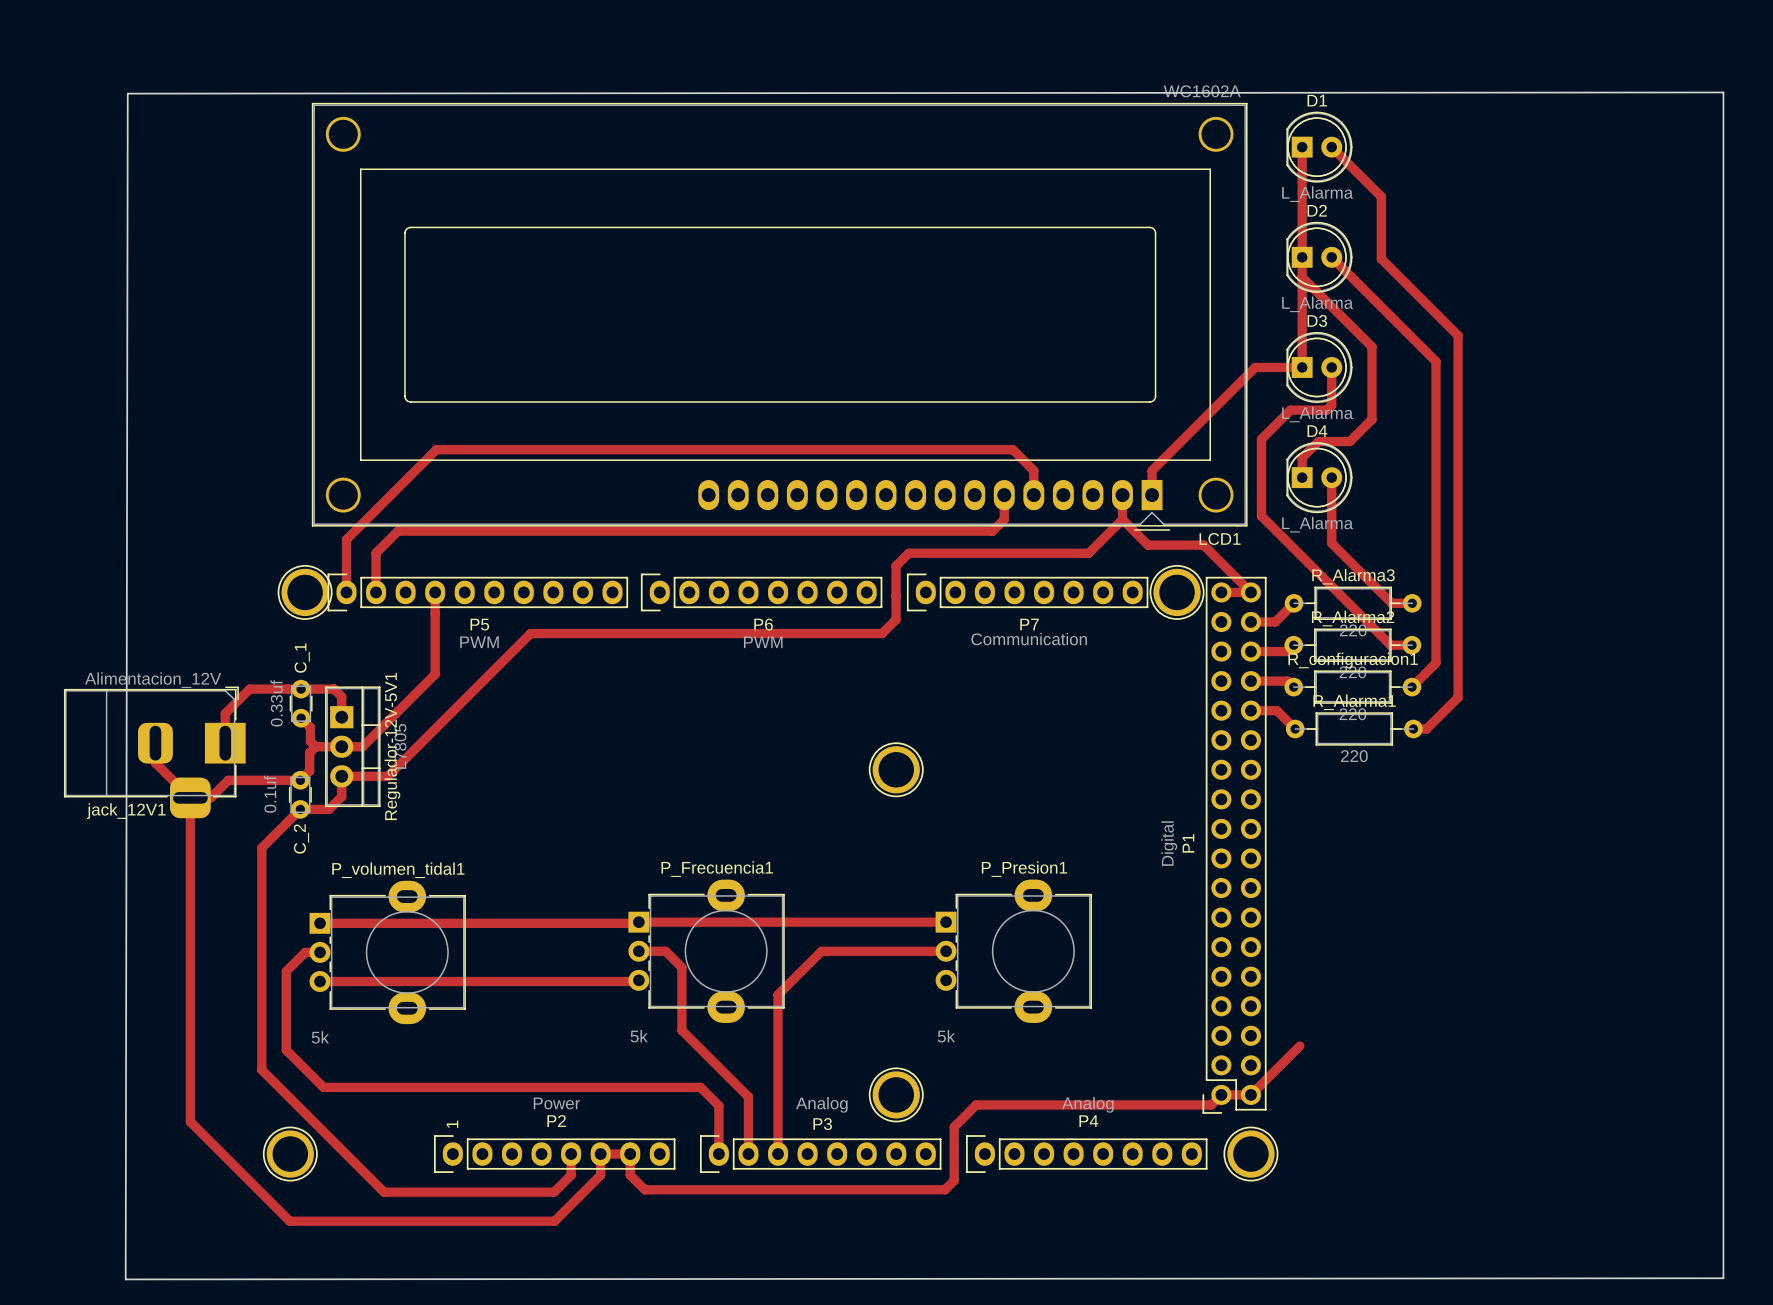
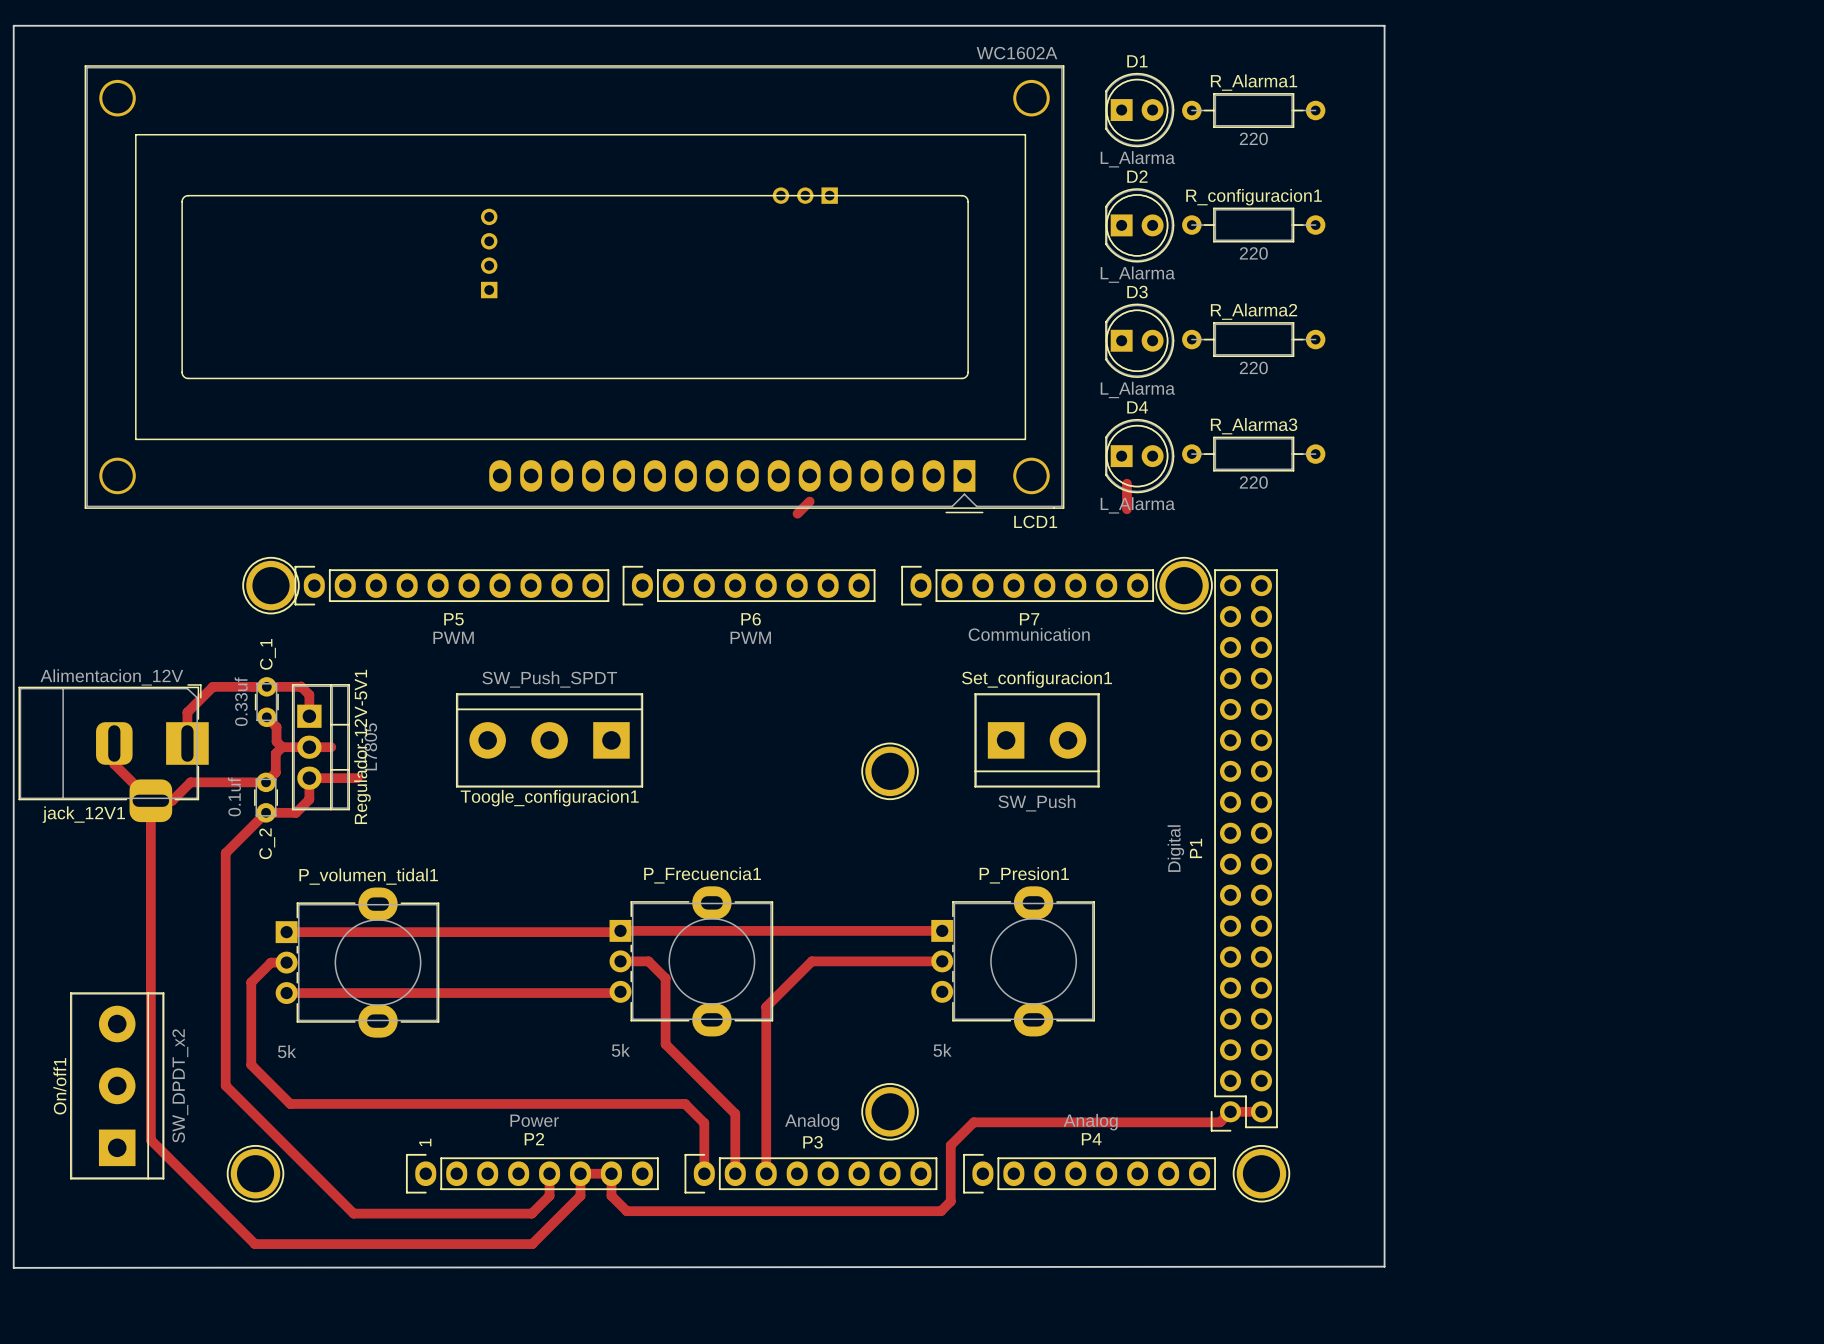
board edge: (1723, 92) (1723, 1278) (125, 1279) (127, 93) (1723, 92) -> (13, 25) (13, 1267) (1384, 1266) (1384, 25) (13, 25)
track: (1302, 147) (1302, 367) (1255, 367) (1152, 470) (1152, 495) -> none
D1 position: (1319, 147) -> (1139, 110)
track: (1331, 147) (1381, 196) (1381, 258) (1458, 335) (1458, 697) (1426, 728) (1413, 728) -> none
part: none -> (805, 195)
D2 position: (1319, 257) -> (1139, 225)
track: (1331, 257) (1436, 361) (1436, 663) (1411, 687) -> none
part: none -> (489, 253)
track: (1302, 277) (1372, 346) (1372, 419) (1349, 441) (1318, 441) (1302, 457) (1302, 477) -> none
LCD1 position: (779, 316) -> (574, 289)
D3 position: (1319, 367) -> (1139, 340)
track: (1331, 367) (1331, 405) (1326, 410) (1290, 410) (1261, 439) (1261, 516) (1390, 645) (1411, 645) -> none
D4 position: (1319, 477) -> (1139, 456)
track: (1331, 477) (1331, 543) (1391, 603) (1412, 603) -> none
track: (1004, 495) (1004, 519) (992, 531) (397, 531) (376, 553) (376, 592) -> none
track: (1033, 495) (1033, 470) (1012, 449) (436, 449) (346, 539) (346, 592) -> none
track: none -> (809, 501) (797, 513)
track: (435, 592) (435, 674) (362, 746) -> none
track: (1221, 592) (1250, 592) (1203, 545) (1148, 545) (1122, 519) (1088, 553) (908, 553) (896, 566) (896, 619) (882, 633) (530, 633) (387, 776) -> none
track: (1294, 603) (1275, 622) (1250, 622) -> none
R_Alarma3 position: (1353, 603) -> (1253, 454)
track: (1293, 645) (1287, 651) (1250, 651) -> none
R_Alarma2 position: (1352, 645) -> (1253, 339)
track: (1250, 681) (1287, 681) (1293, 687) -> none
R_configuracion1 position: (1352, 687) -> (1253, 225)
track: (1250, 710) (1276, 710) (1295, 728) -> none
R_Alarma1 position: (1354, 728) -> (1253, 110)
Toogle_configuracion1: none -> SW_Push_SPDT (549, 740)
Set_configuracion1: none -> SW_Push (1037, 740)
track: (1299, 1046) (1250, 1094) -> none
On/off1: none -> SW_DPDT_x2 (117, 1085)

